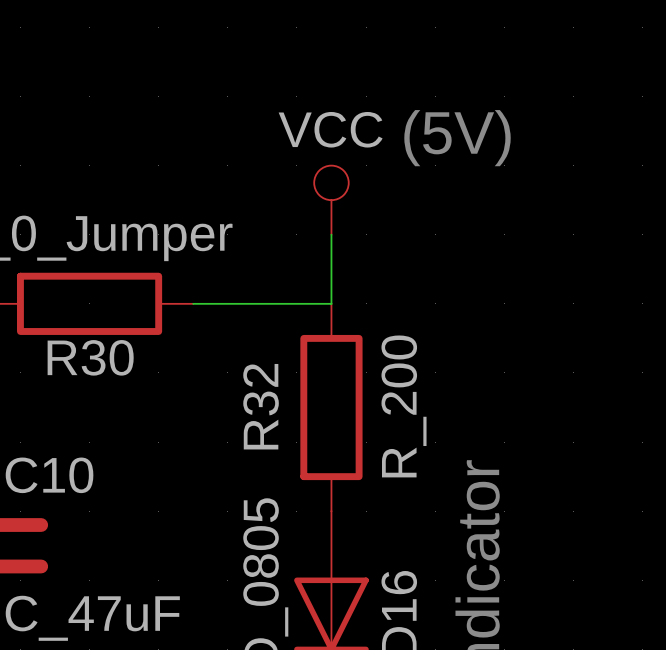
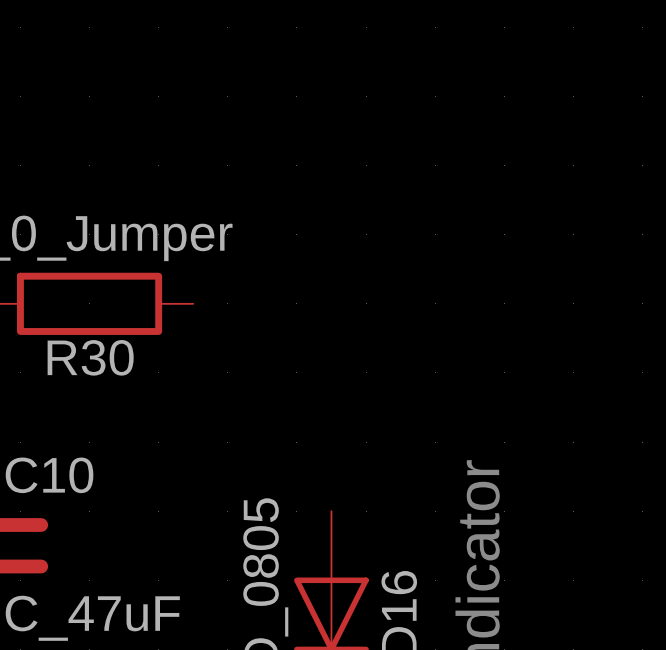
text: (5V) (457, 138) -> none
power symbol: VCC (331, 200) -> none
wire: (331, 234) (331, 303) (193, 303) -> none
R32: R_200 (331, 407) -> none

